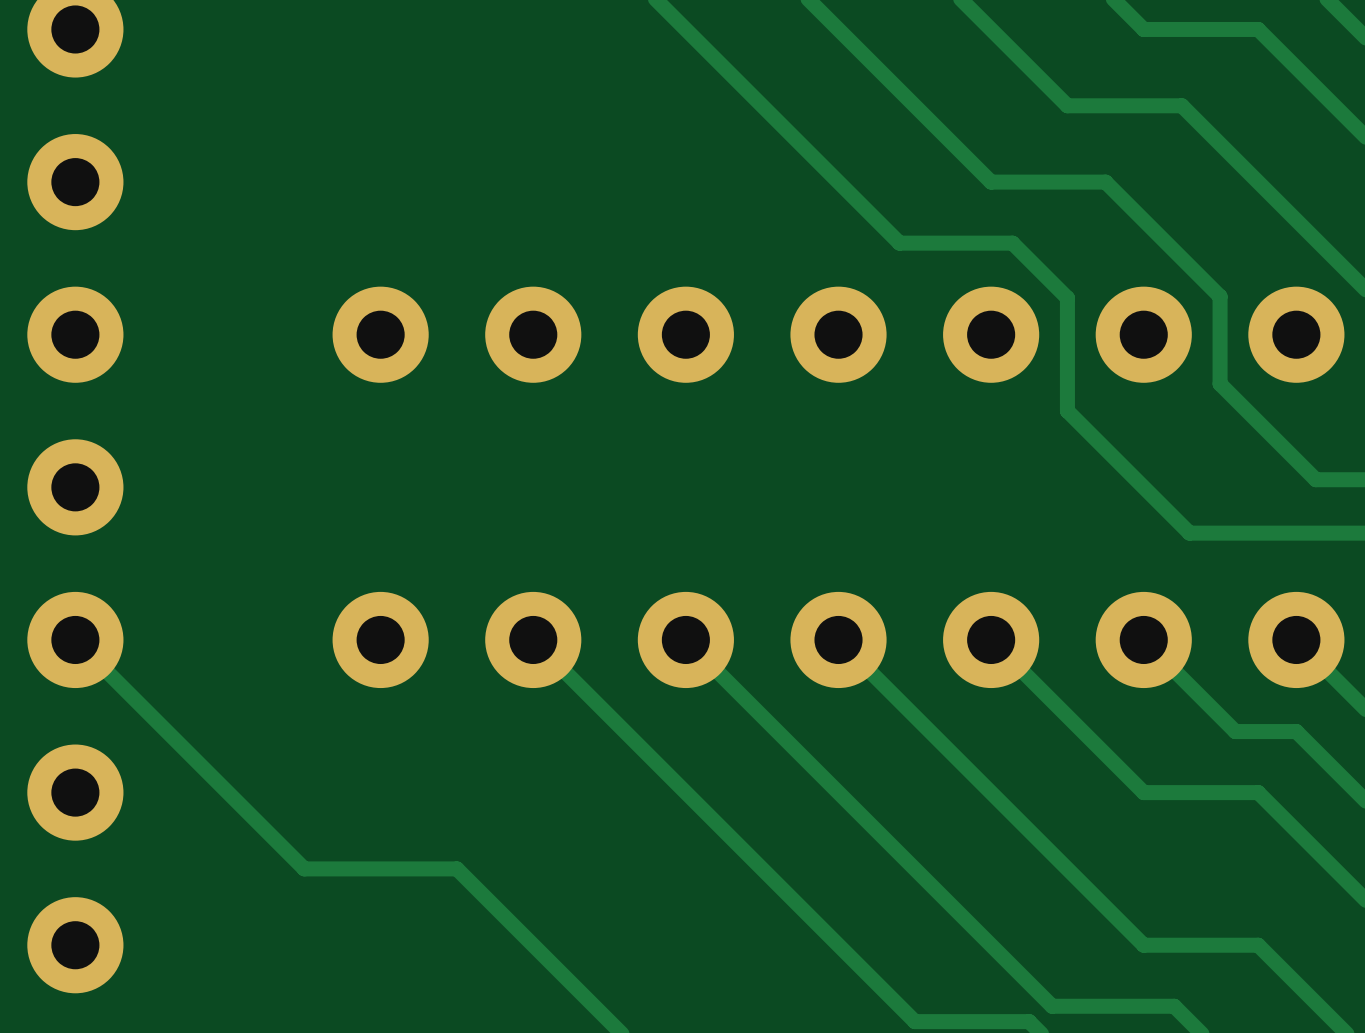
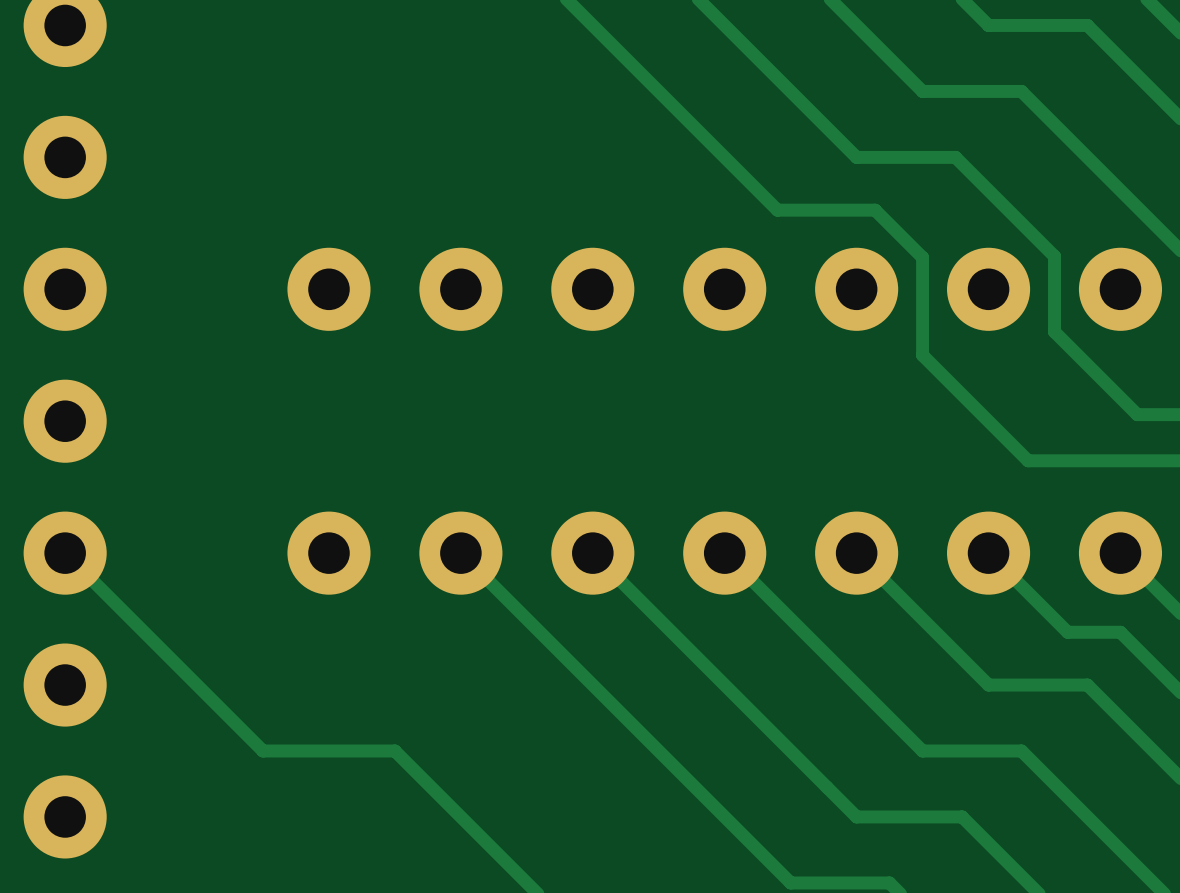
track: (1067, 868) (1143, 945) (1258, 945) -> (922, 751) (1021, 751) (1087, 816)
track: (991, 945) (1052, 1006) (1174, 1006) -> (856, 816) (962, 816) (1014, 869)

